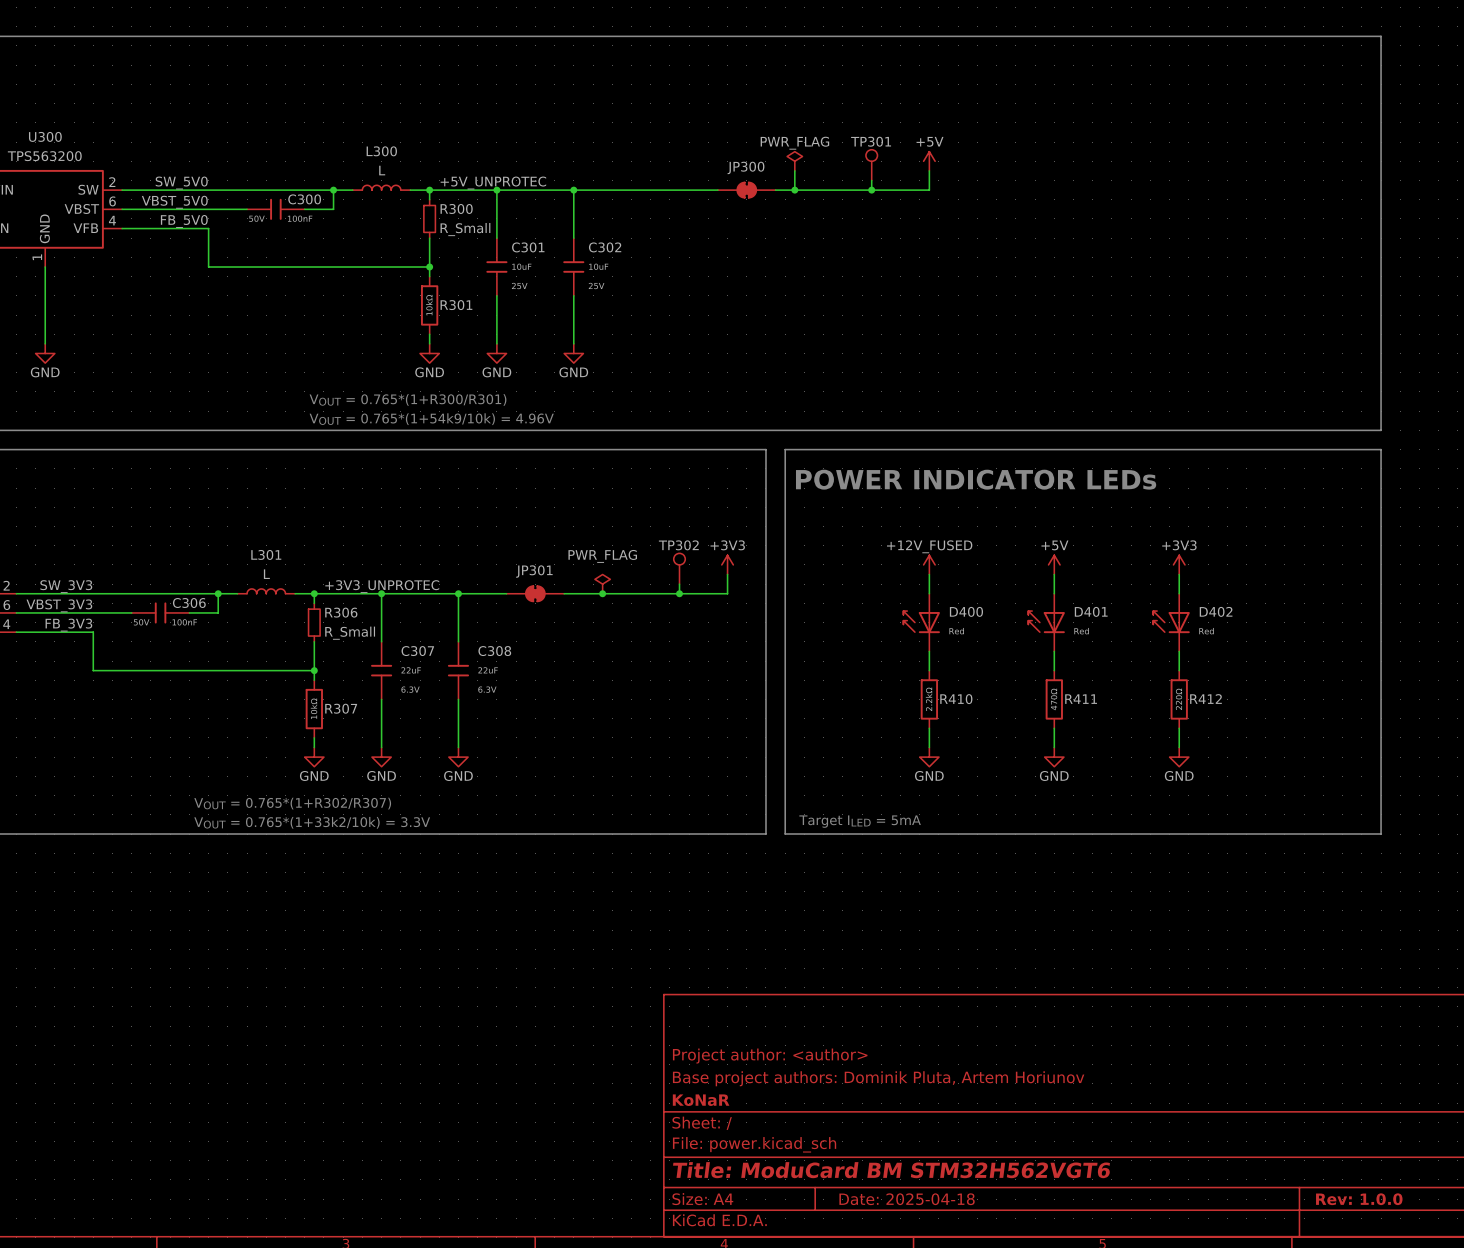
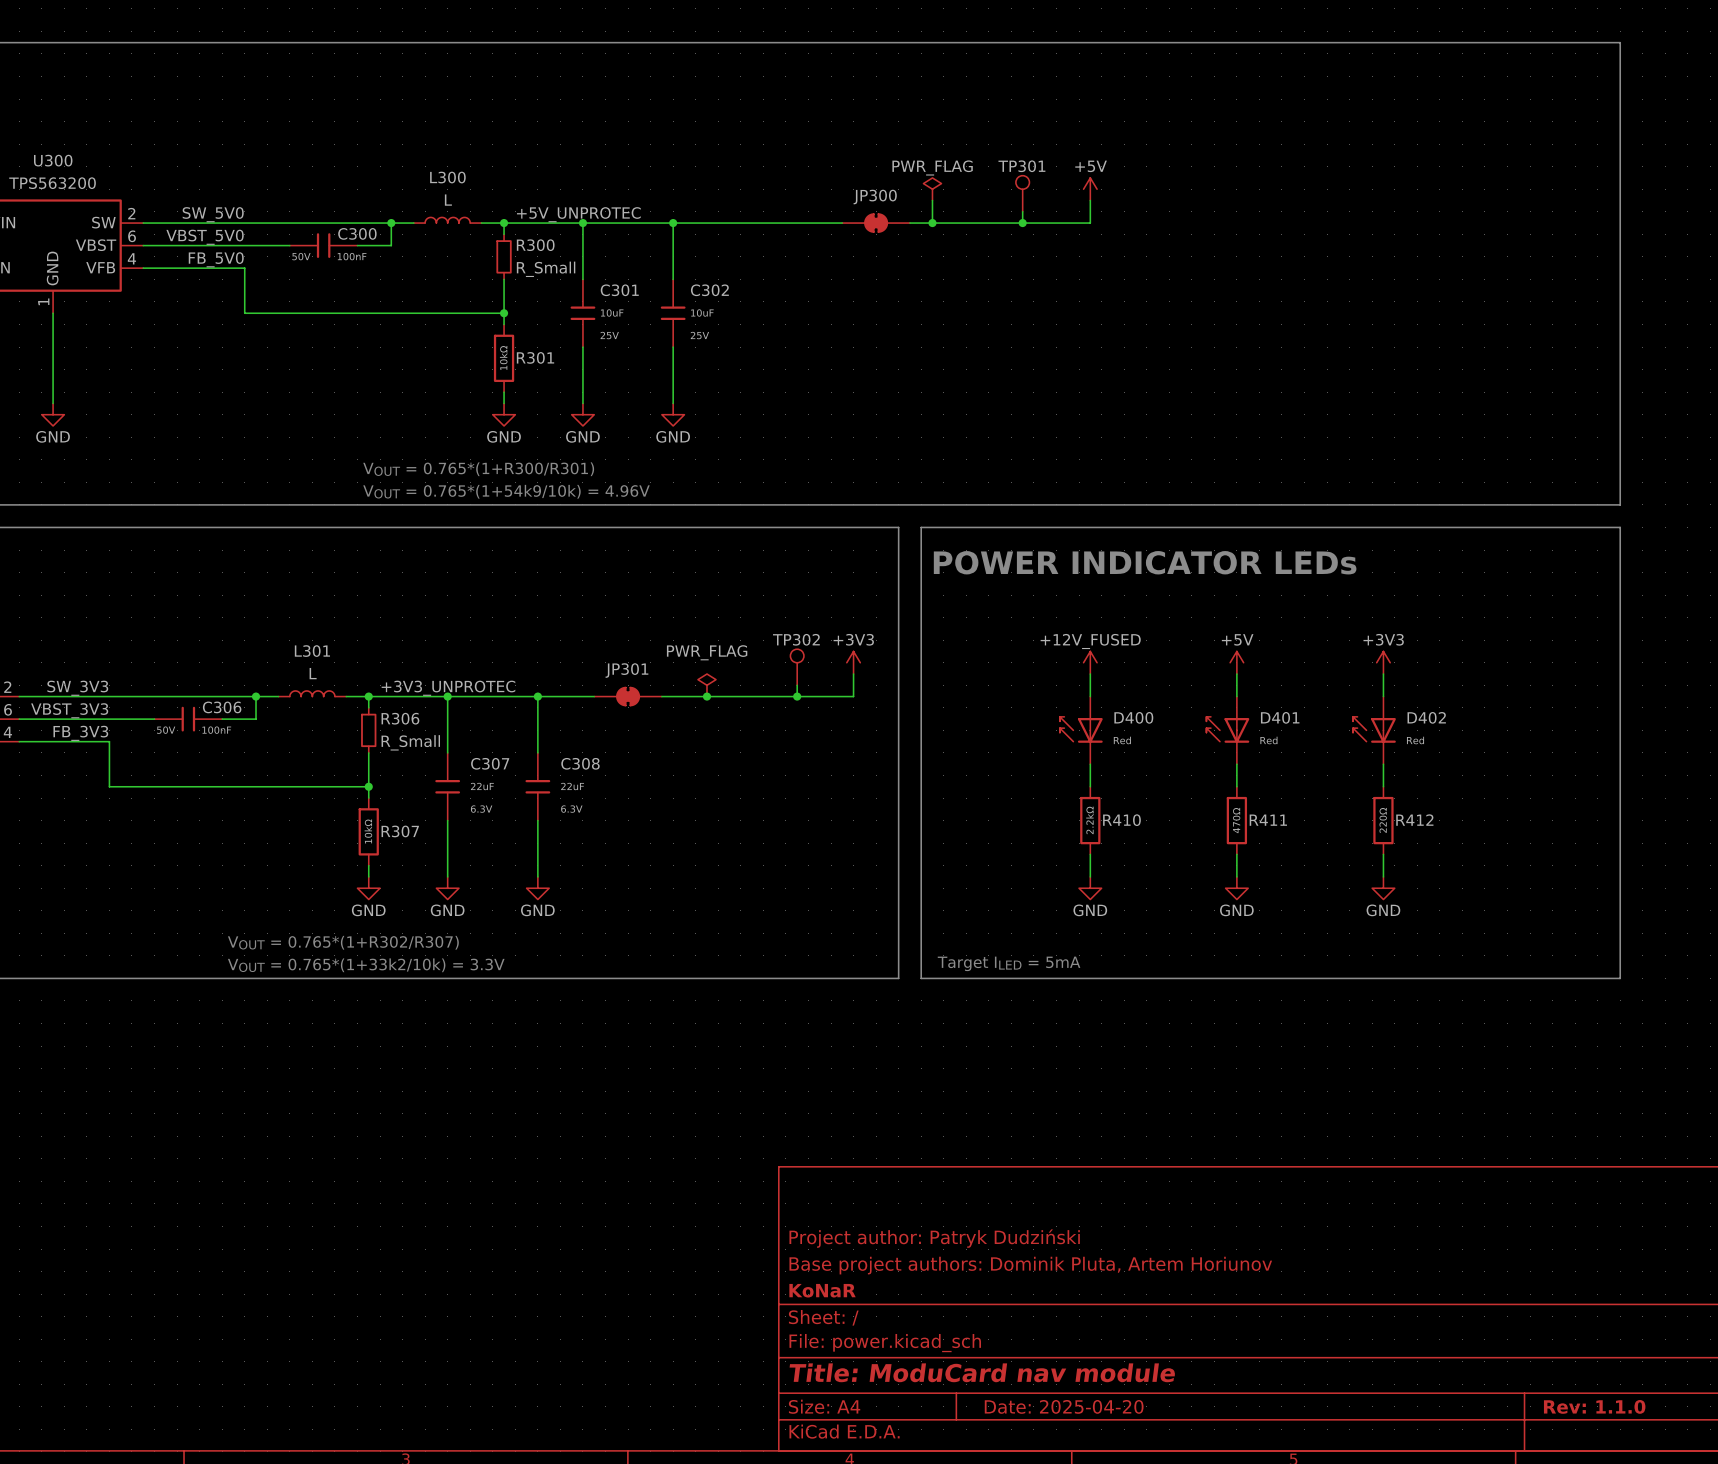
title block: Project author: <author> (770, 1056) -> Project author: Patryk Dudziński (934, 1238)
title block: Title: ModuCard BM STM32H562VGT6 (891, 1170) -> Title: ModuCard nav module (982, 1372)
title block: Date: 2025-04-18 (907, 1199) -> Date: 2025-04-20 (1064, 1406)
title block: Rev: 1.0.0 (1359, 1199) -> Rev: 1.1.0 (1594, 1406)

